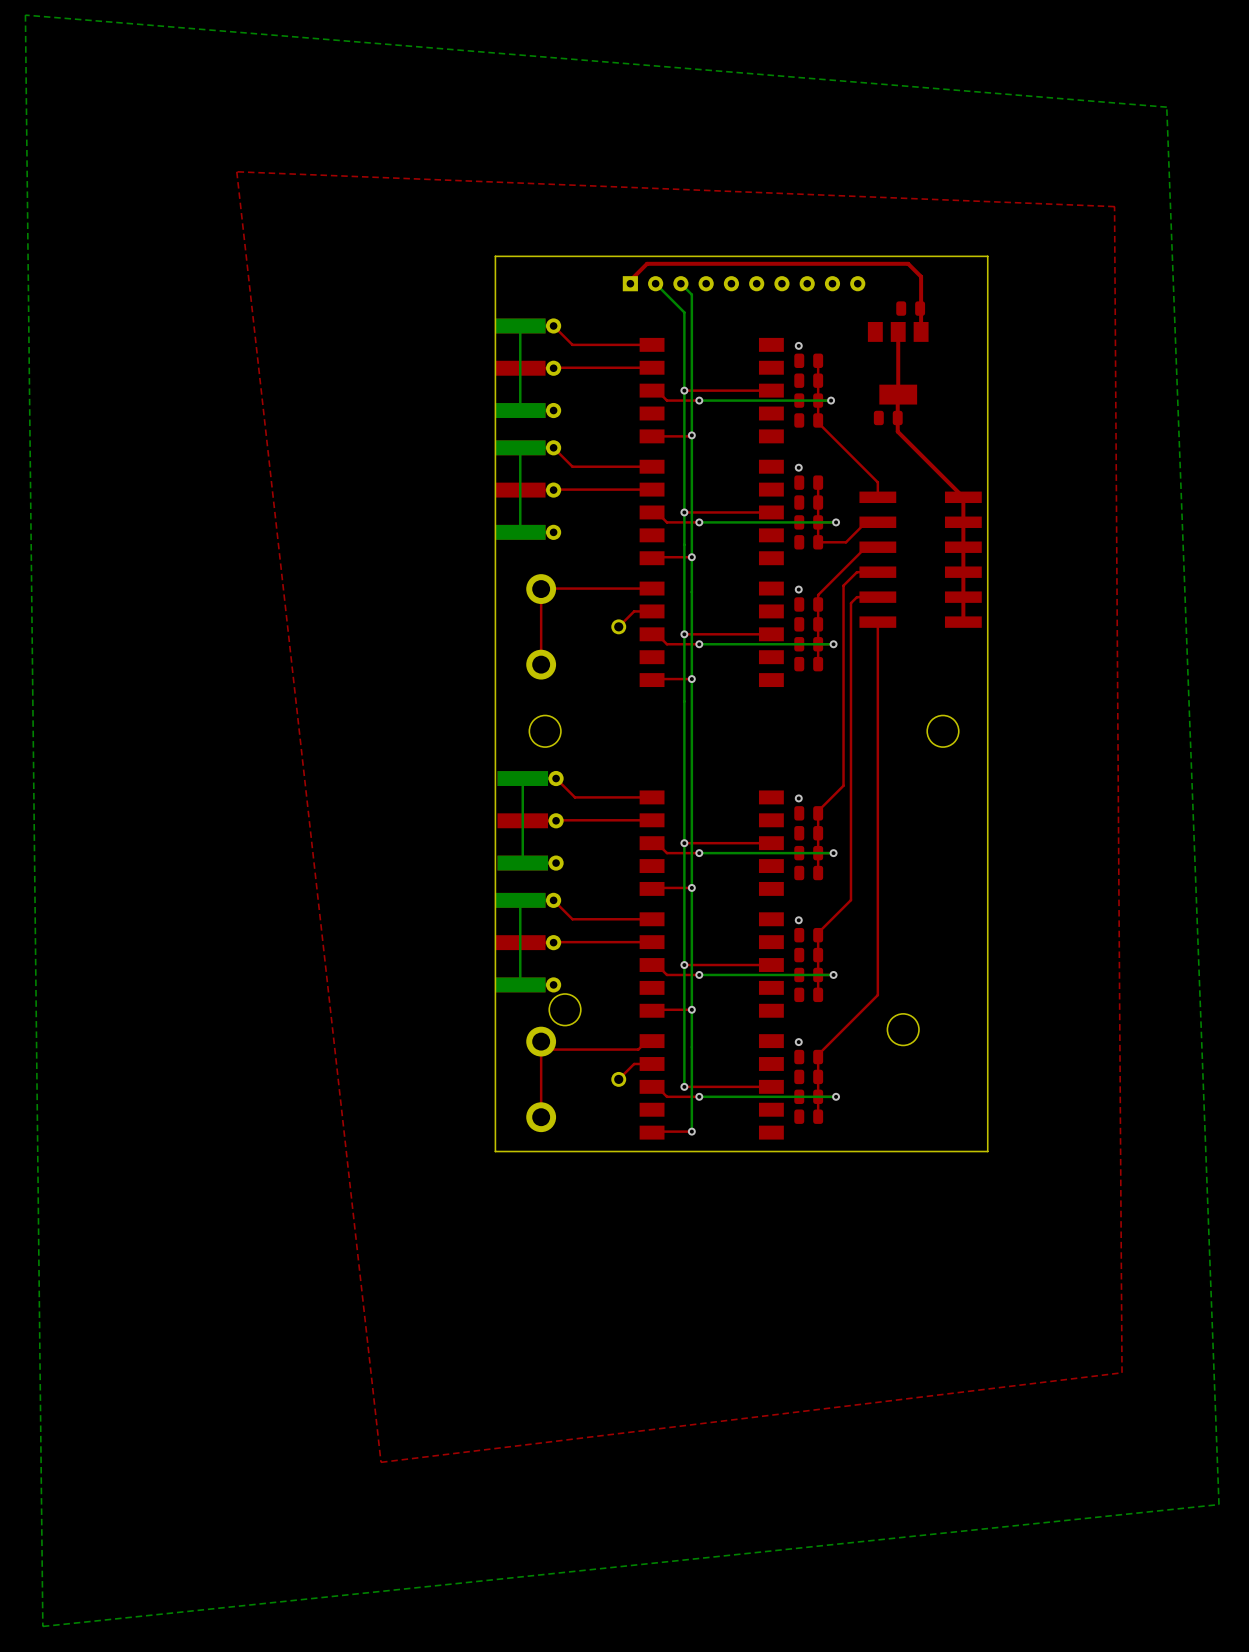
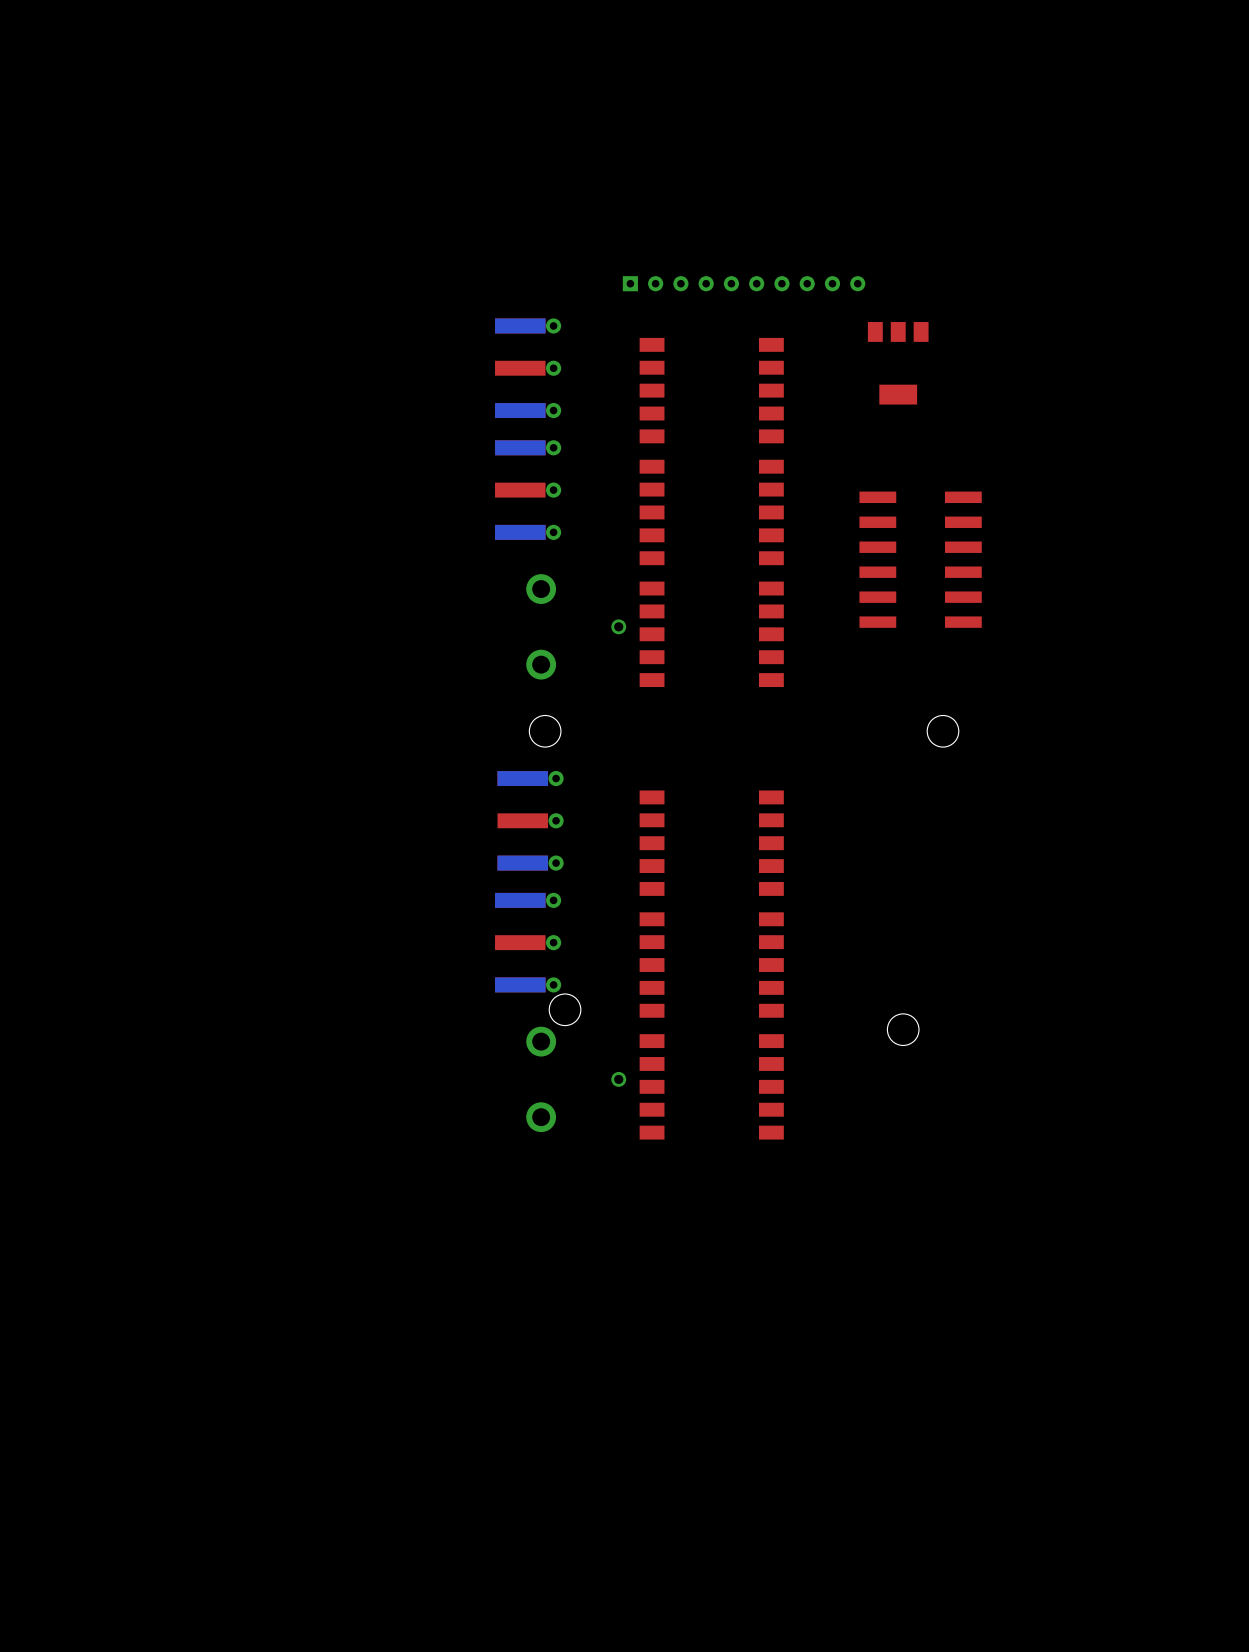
bottom zone outline: (25, 15) (1166, 107) (1218, 1504) (42, 1626) (25, 15) -> none
top zone outline: (236, 171) (1114, 206) (1122, 1372) (381, 1462) (236, 171) -> none
board edge: (987, 256) (987, 1151) (495, 1151) (495, 256) (987, 256) -> none
bottom track: (680, 283) (691, 294) (691, 1131) -> none
top track: (630, 284) (630, 280) (647, 263) (908, 263) (921, 276) (921, 331) -> none
bottom track: (655, 284) (684, 312) (684, 1086) -> none
part: (910, 308) -> none
top track: (520, 325) (553, 325) (572, 344) (652, 344) (648, 348) -> none
bottom track: (553, 325) (520, 325) (520, 410) (553, 410) -> none
top track: (898, 331) (897, 431) (963, 497) (963, 622) -> none
via: (798, 345) -> none
part: (808, 360) -> none
top track: (818, 360) (818, 422) (877, 482) (877, 497) -> none
top track: (652, 367) (520, 368) -> none
part: (808, 380) -> none
top track: (652, 390) (666, 400) (699, 400) -> none
via: (684, 390) -> none
top track: (771, 390) (684, 390) -> none
via: (699, 400) -> none
part: (808, 400) -> none
bottom track: (831, 400) (699, 400) -> none
via: (831, 400) -> none
part: (888, 417) -> none
part: (808, 420) -> none
top track: (691, 435) (652, 436) -> none
via: (691, 435) -> none
top track: (520, 447) (553, 447) (572, 466) (652, 466) -> none
bottom track: (553, 447) (520, 447) (520, 532) (553, 532) -> none
via: (798, 467) -> none
part: (808, 482) -> none
top track: (818, 482) (818, 542) (846, 542) (866, 522) (877, 522) -> none
top track: (652, 489) (520, 490) -> none
part: (808, 502) -> none
top track: (652, 512) (657, 512) (666, 522) (699, 522) -> none
via: (684, 512) -> none
top track: (771, 512) (684, 512) -> none
via: (699, 522) -> none
part: (808, 522) -> none
bottom track: (836, 522) (699, 522) -> none
via: (836, 522) -> none
part: (808, 542) -> none
top track: (877, 547) (865, 547) (818, 595) (818, 661) -> none
top track: (691, 557) (652, 558) -> none
via: (691, 557) -> none
top track: (877, 572) (856, 572) (843, 585) (843, 785) (818, 811) (818, 875) -> none
top track: (652, 588) (541, 588) (541, 664) -> none
via: (798, 589) -> none
top track: (877, 597) (856, 597) (850, 603) (850, 900) (818, 932) (818, 994) -> none
part: (808, 604) -> none
top track: (652, 611) (634, 611) (618, 626) -> none
top track: (877, 622) (877, 995) (818, 1054) (818, 1116) -> none
part: (808, 624) -> none
top track: (652, 634) (657, 634) (666, 644) (699, 644) -> none
via: (684, 634) -> none
top track: (771, 634) (684, 634) -> none
via: (699, 644) -> none
part: (808, 644) -> none
bottom track: (833, 644) (699, 644) -> none
via: (833, 644) -> none
part: (808, 664) -> none
top track: (691, 679) (652, 680) -> none
via: (691, 679) -> none
top track: (522, 778) (556, 778) (574, 797) (652, 797) -> none
bottom track: (556, 778) (522, 778) (522, 863) (556, 863) -> none
via: (798, 798) -> none
part: (808, 813) -> none
top track: (652, 820) (522, 820) -> none
part: (808, 833) -> none
top track: (652, 843) (657, 843) (666, 853) (699, 853) -> none
via: (684, 843) -> none
top track: (771, 843) (684, 843) -> none
via: (699, 853) -> none
part: (808, 853) -> none
bottom track: (833, 853) (699, 853) -> none
via: (833, 853) -> none
part: (808, 873) -> none
top track: (691, 887) (652, 888) -> none
via: (691, 887) -> none
top track: (520, 900) (553, 900) (572, 919) (652, 919) -> none
bottom track: (553, 900) (520, 900) (520, 984) (553, 984) -> none
via: (798, 920) -> none
part: (808, 935) -> none
top track: (652, 942) (520, 942) -> none
part: (808, 955) -> none
top track: (652, 965) (657, 965) (666, 974) (699, 974) -> none
via: (684, 965) -> none
top track: (771, 965) (684, 965) -> none
via: (699, 974) -> none
part: (808, 974) -> none
bottom track: (833, 974) (699, 974) -> none
via: (833, 974) -> none
part: (808, 994) -> none
top track: (691, 1009) (652, 1010) -> none
via: (691, 1009) -> none
top track: (652, 1041) (646, 1041) (638, 1049) (549, 1049) (541, 1041) (541, 1117) -> none
via: (798, 1042) -> none
part: (808, 1057) -> none
top track: (652, 1063) (634, 1063) (618, 1079) -> none
part: (808, 1076) -> none
top track: (652, 1086) (657, 1086) (666, 1096) (699, 1096) -> none
via: (684, 1086) -> none
top track: (771, 1086) (684, 1086) -> none
via: (699, 1096) -> none
part: (808, 1096) -> none
bottom track: (836, 1096) (699, 1096) -> none
via: (836, 1096) -> none
part: (808, 1116) -> none
top track: (691, 1131) (652, 1132) -> none
via: (691, 1131) -> none

